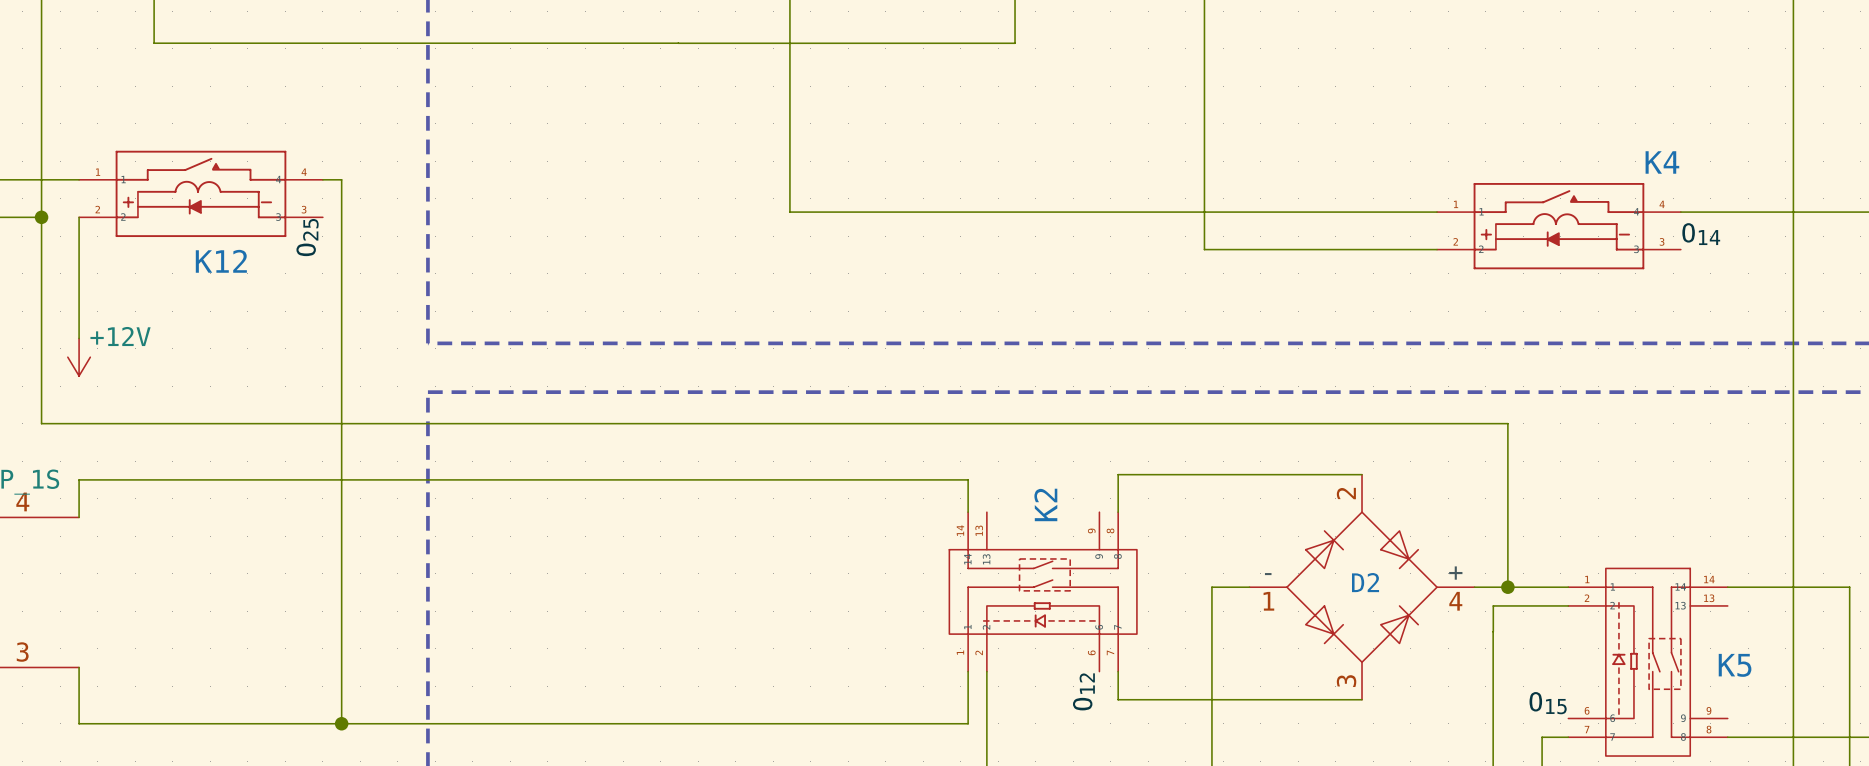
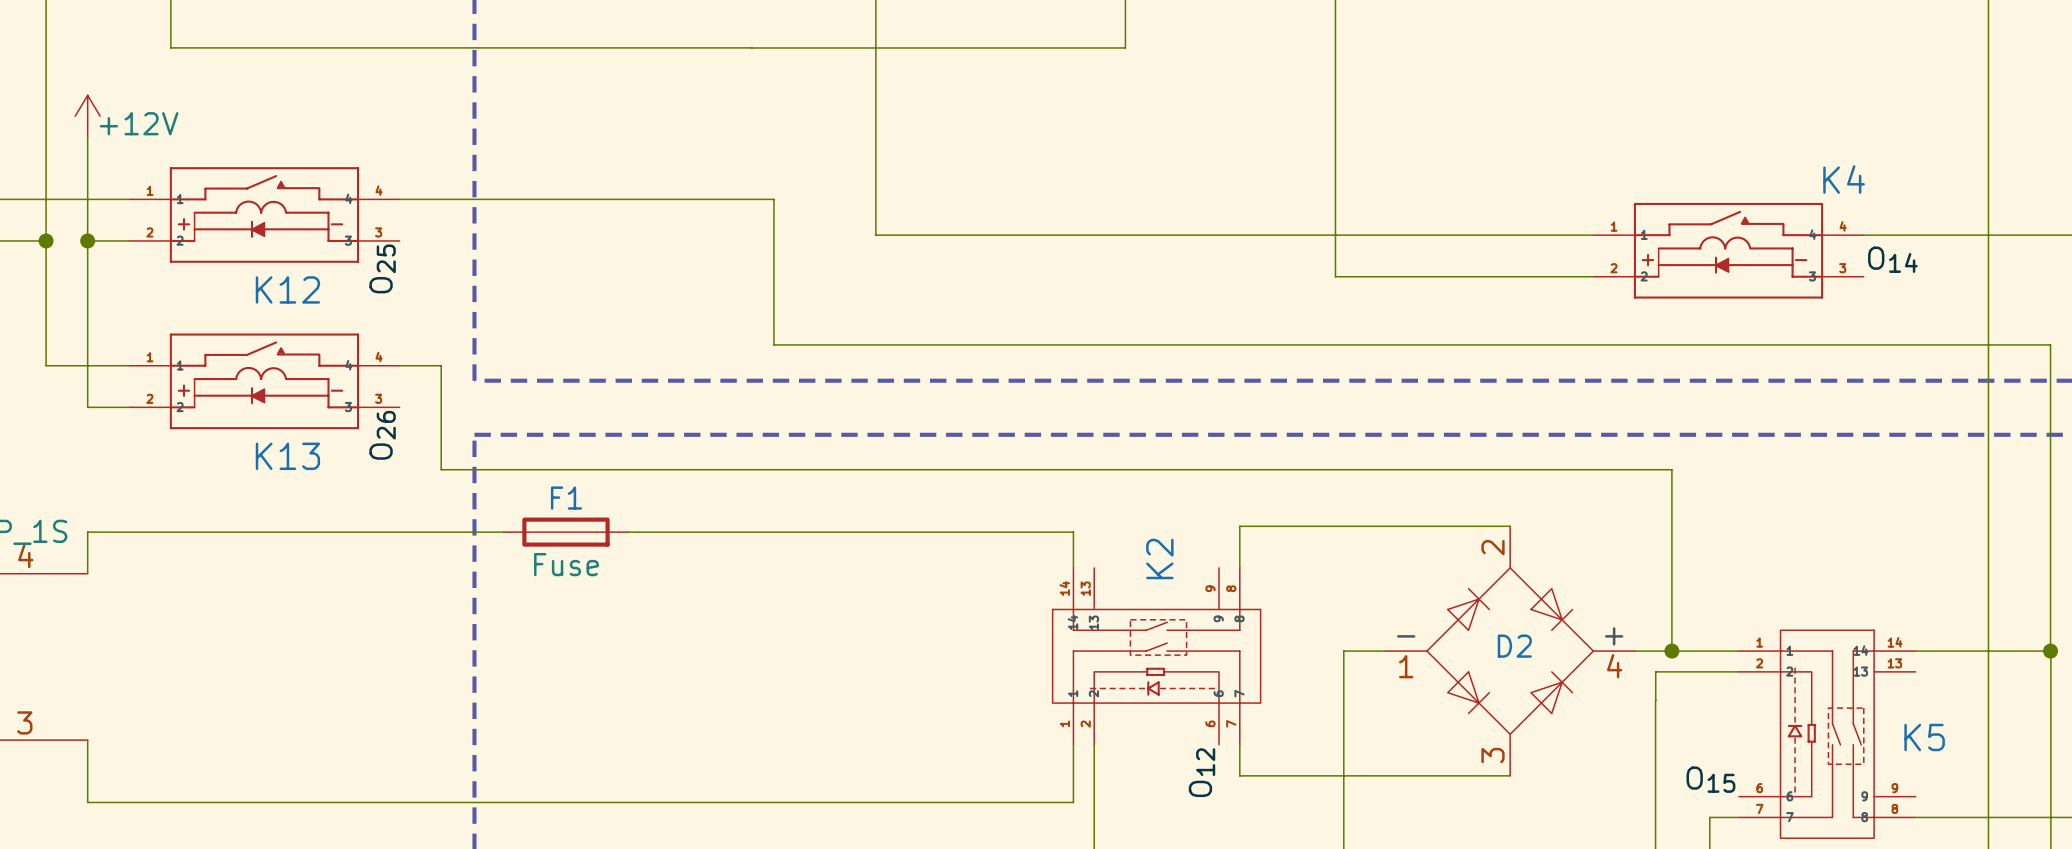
wire: none -> (87, 136) (87, 240) (129, 240)
wire: (322, 179) (341, 179) (341, 723) -> none
wire: none -> (399, 199) (773, 199) (773, 344) (2050, 344) (2050, 651)
K12 position: (200, 193) -> (264, 214)
junction: none -> (87, 240)
label position: O25 (307, 237) -> O25 (382, 268)
wire: (41, 329) (41, 423) (397, 423) -> (46, 365) (129, 365)
wire: none -> (399, 365) (441, 365) (441, 469)
wire: none -> (87, 375) (87, 407) (129, 407)
K13: none -> (264, 381)
power symbol rotation: 0° (79, 357) -> 180° (87, 116)
power symbol position: +12V (79, 357) -> +12V (87, 116)
label: none -> O26 (382, 435)
F1: none -> Fuse (565, 532)
junction: none -> (2050, 651)
junction: (341, 723) -> none

